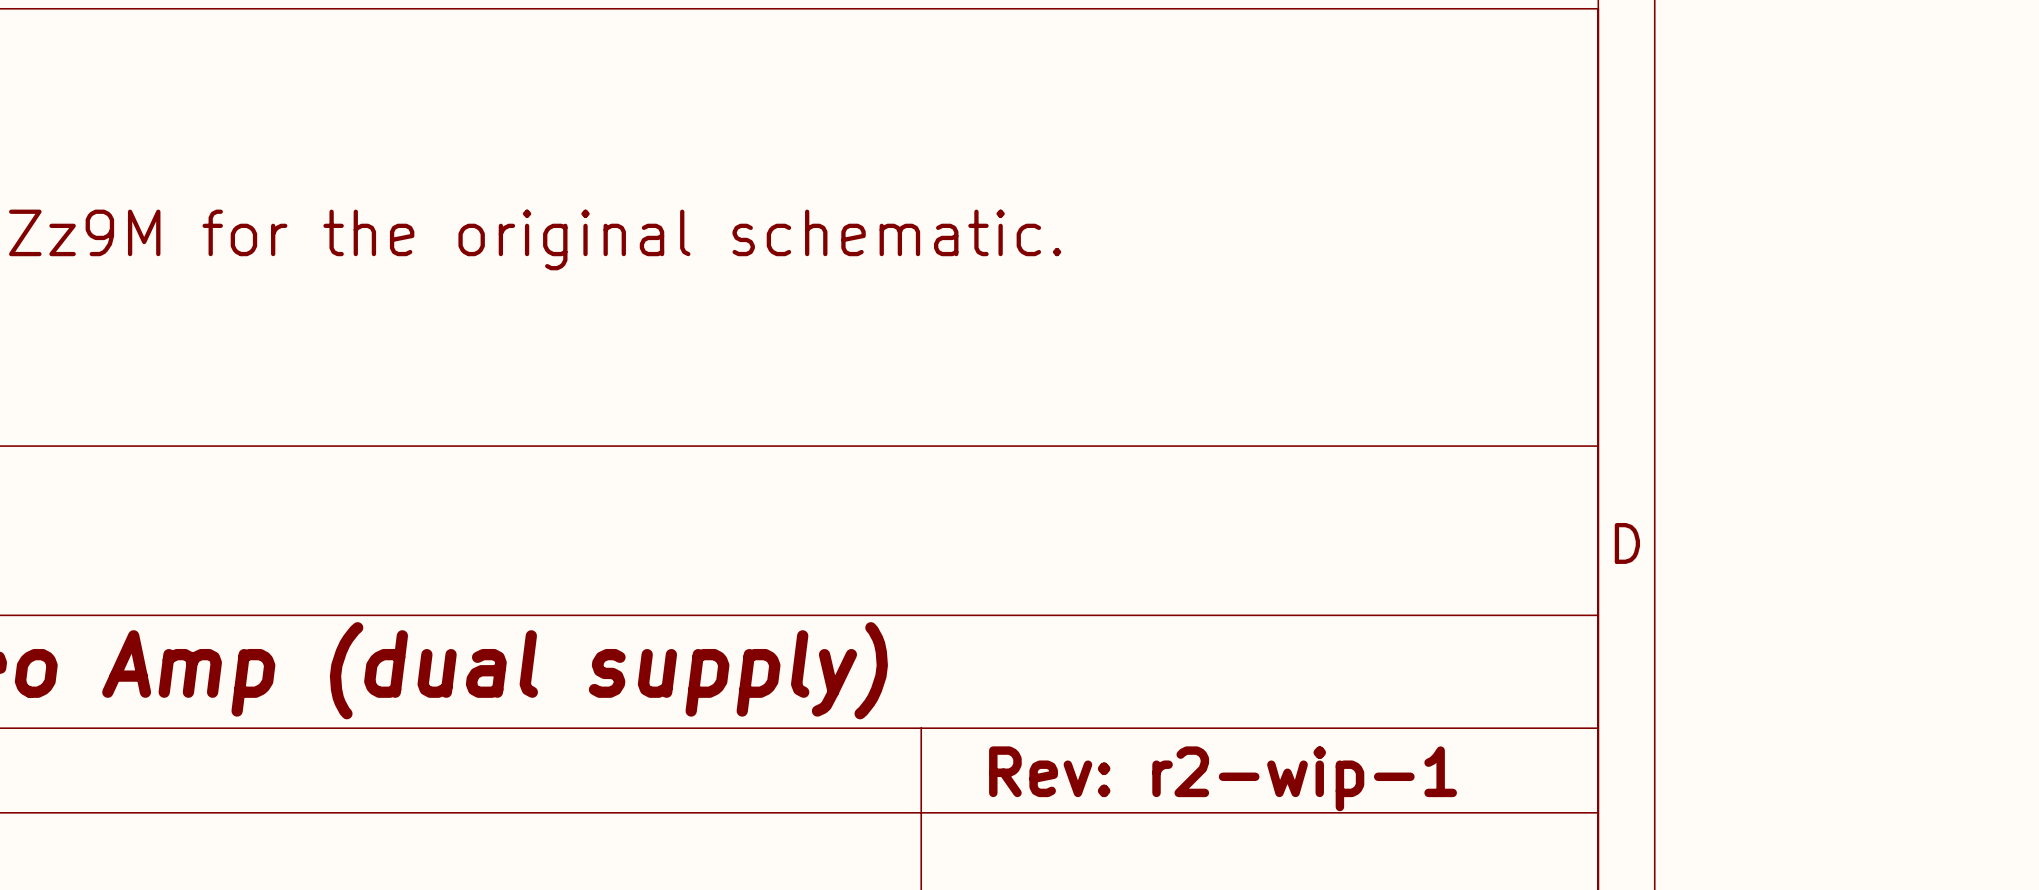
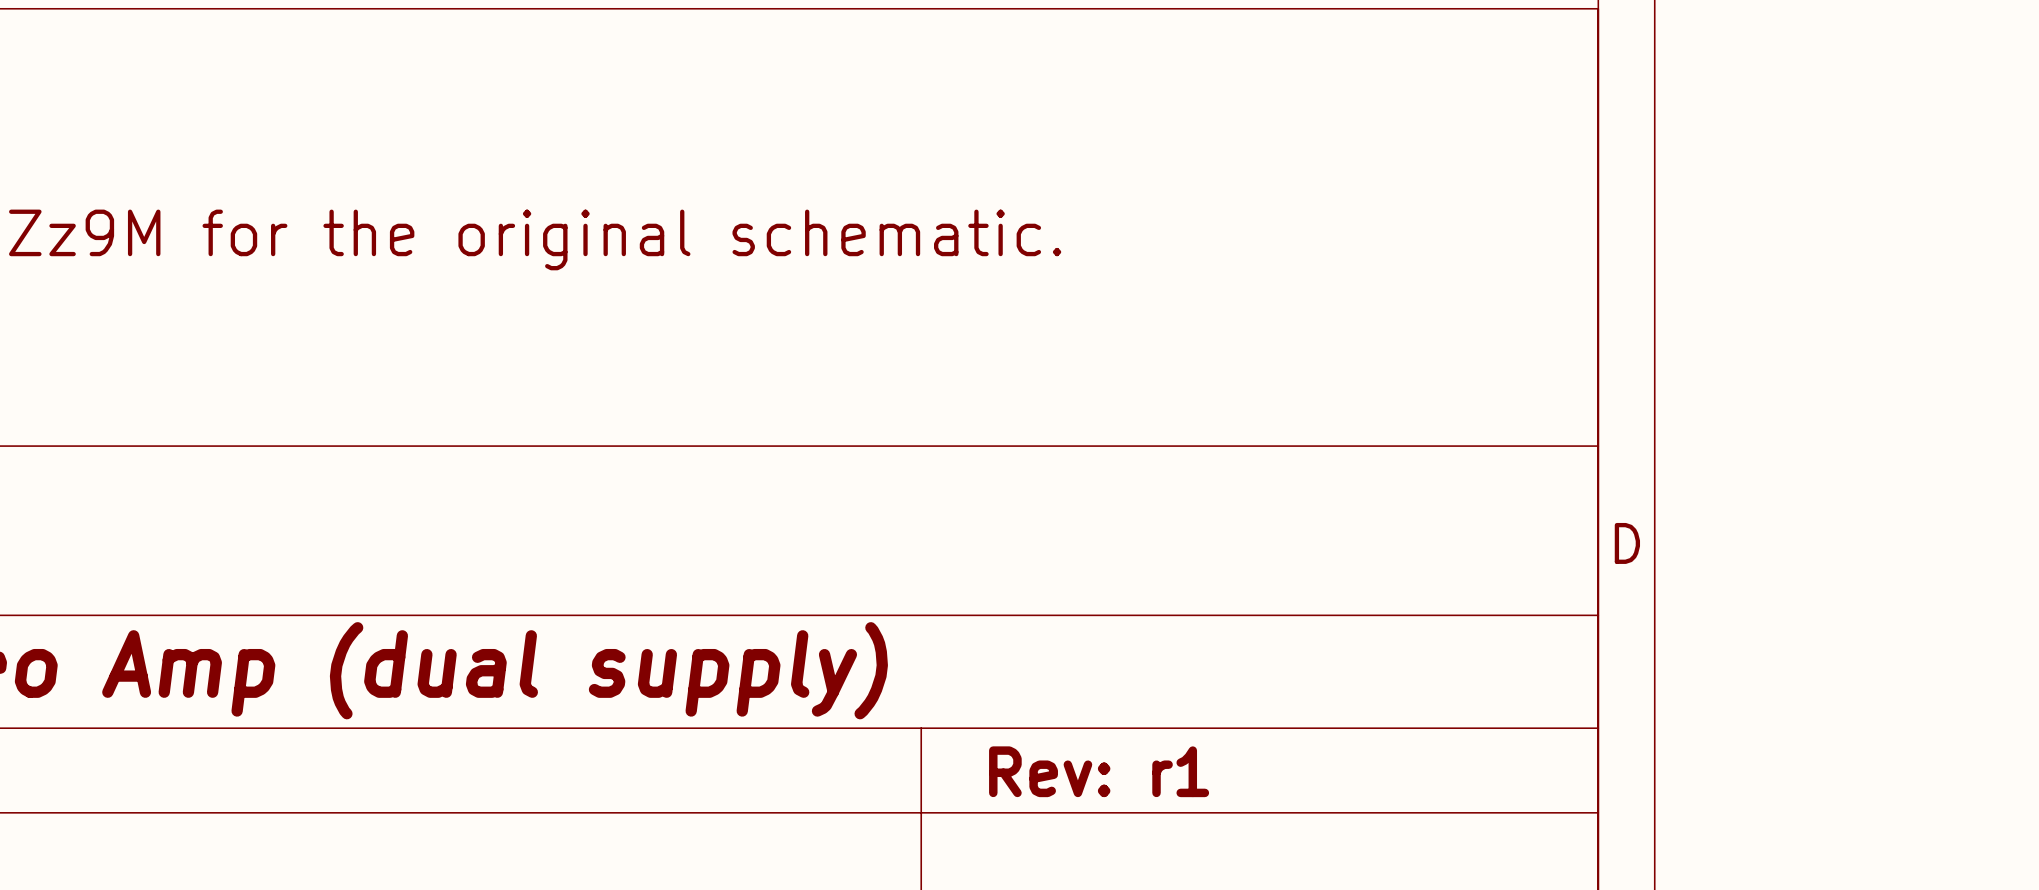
title block: Rev: r2-wip-1 (1223, 778) -> Rev: r1 (1099, 771)

